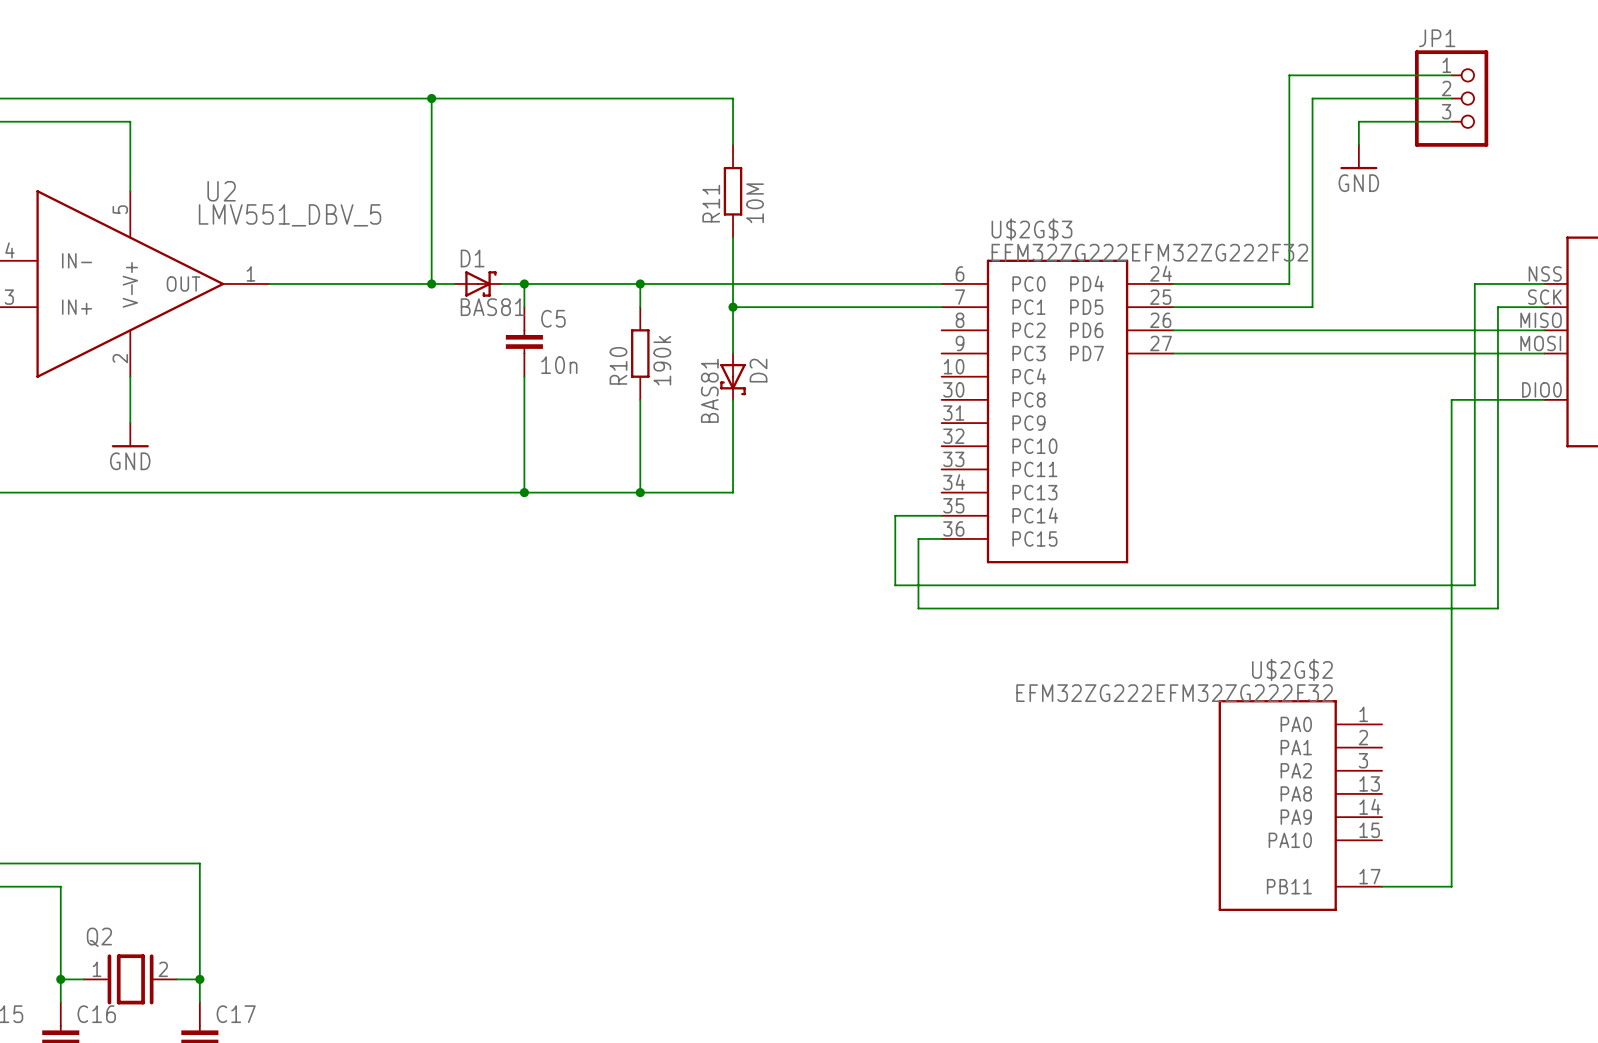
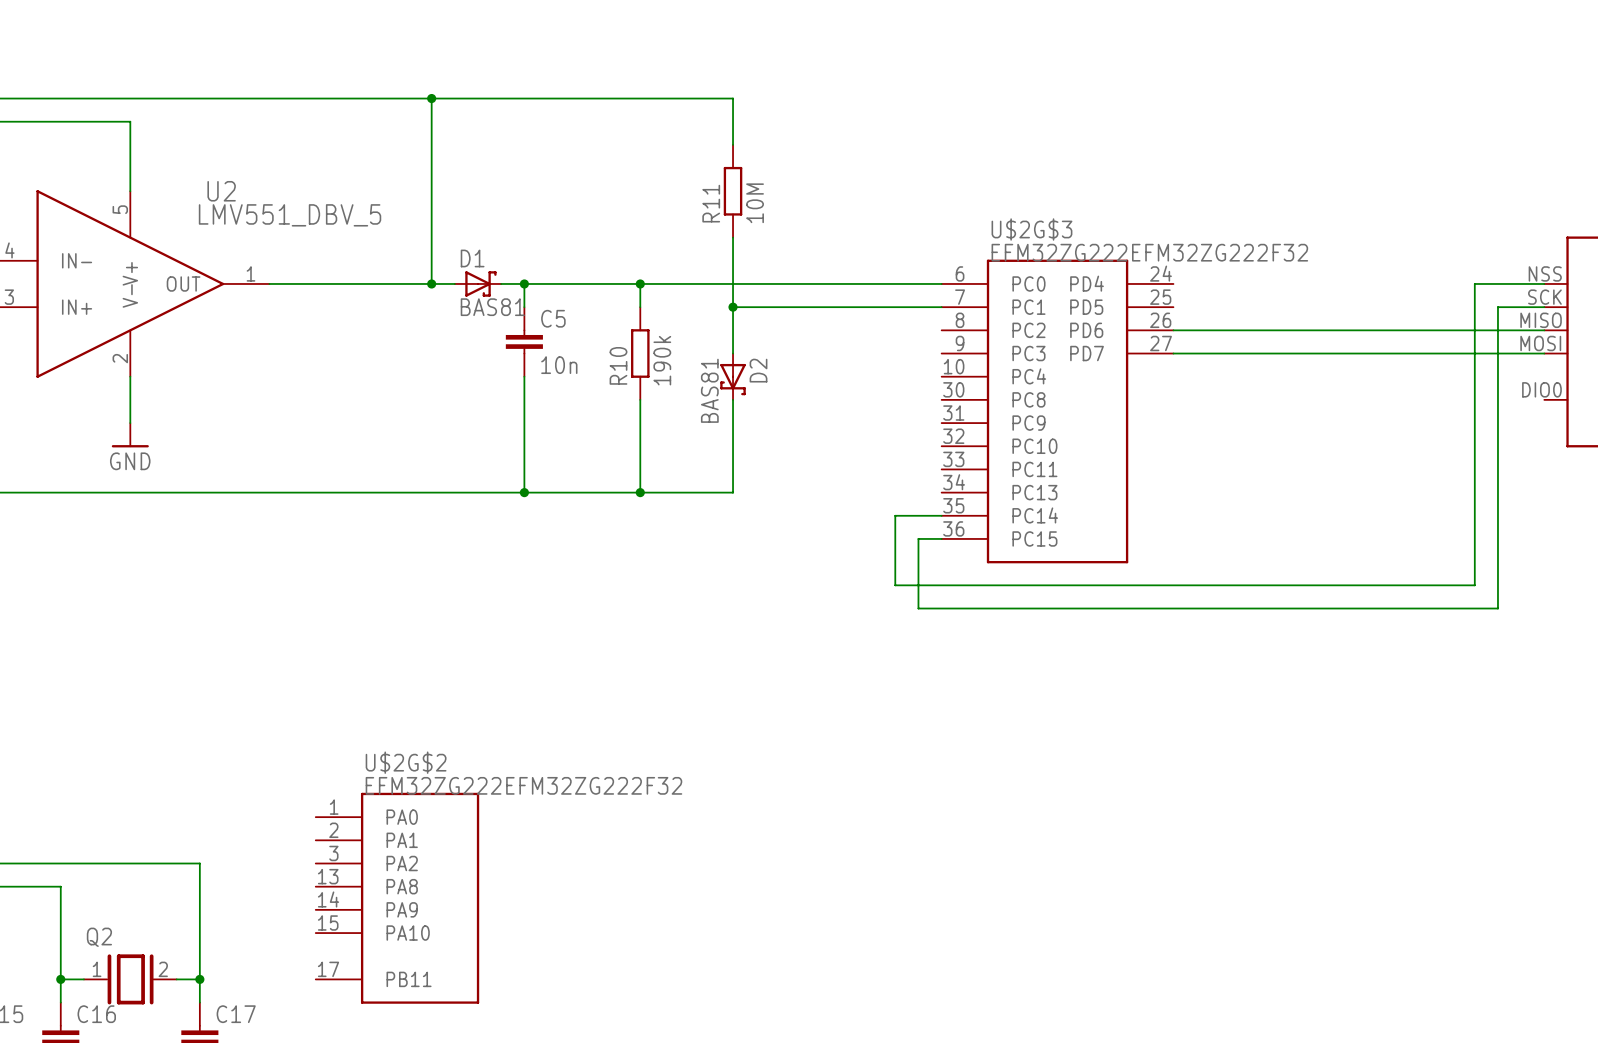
wire: (1451, 75) (1289, 75) (1289, 283) (1173, 283) -> none
wire: (1451, 98) (1312, 98) (1312, 307) (1173, 307) -> none
JP1: (1451, 98) -> none
wire: (1451, 121) (1358, 121) (1358, 144) -> none
power symbol: GND (1358, 157) -> none
wire: (1544, 399) (1451, 399) (1451, 886) (1382, 886) -> none
U$2G$2 flip: as is (1277, 805) -> left-right (420, 898)
U$2G$2 position: (1300, 805) -> (397, 898)

